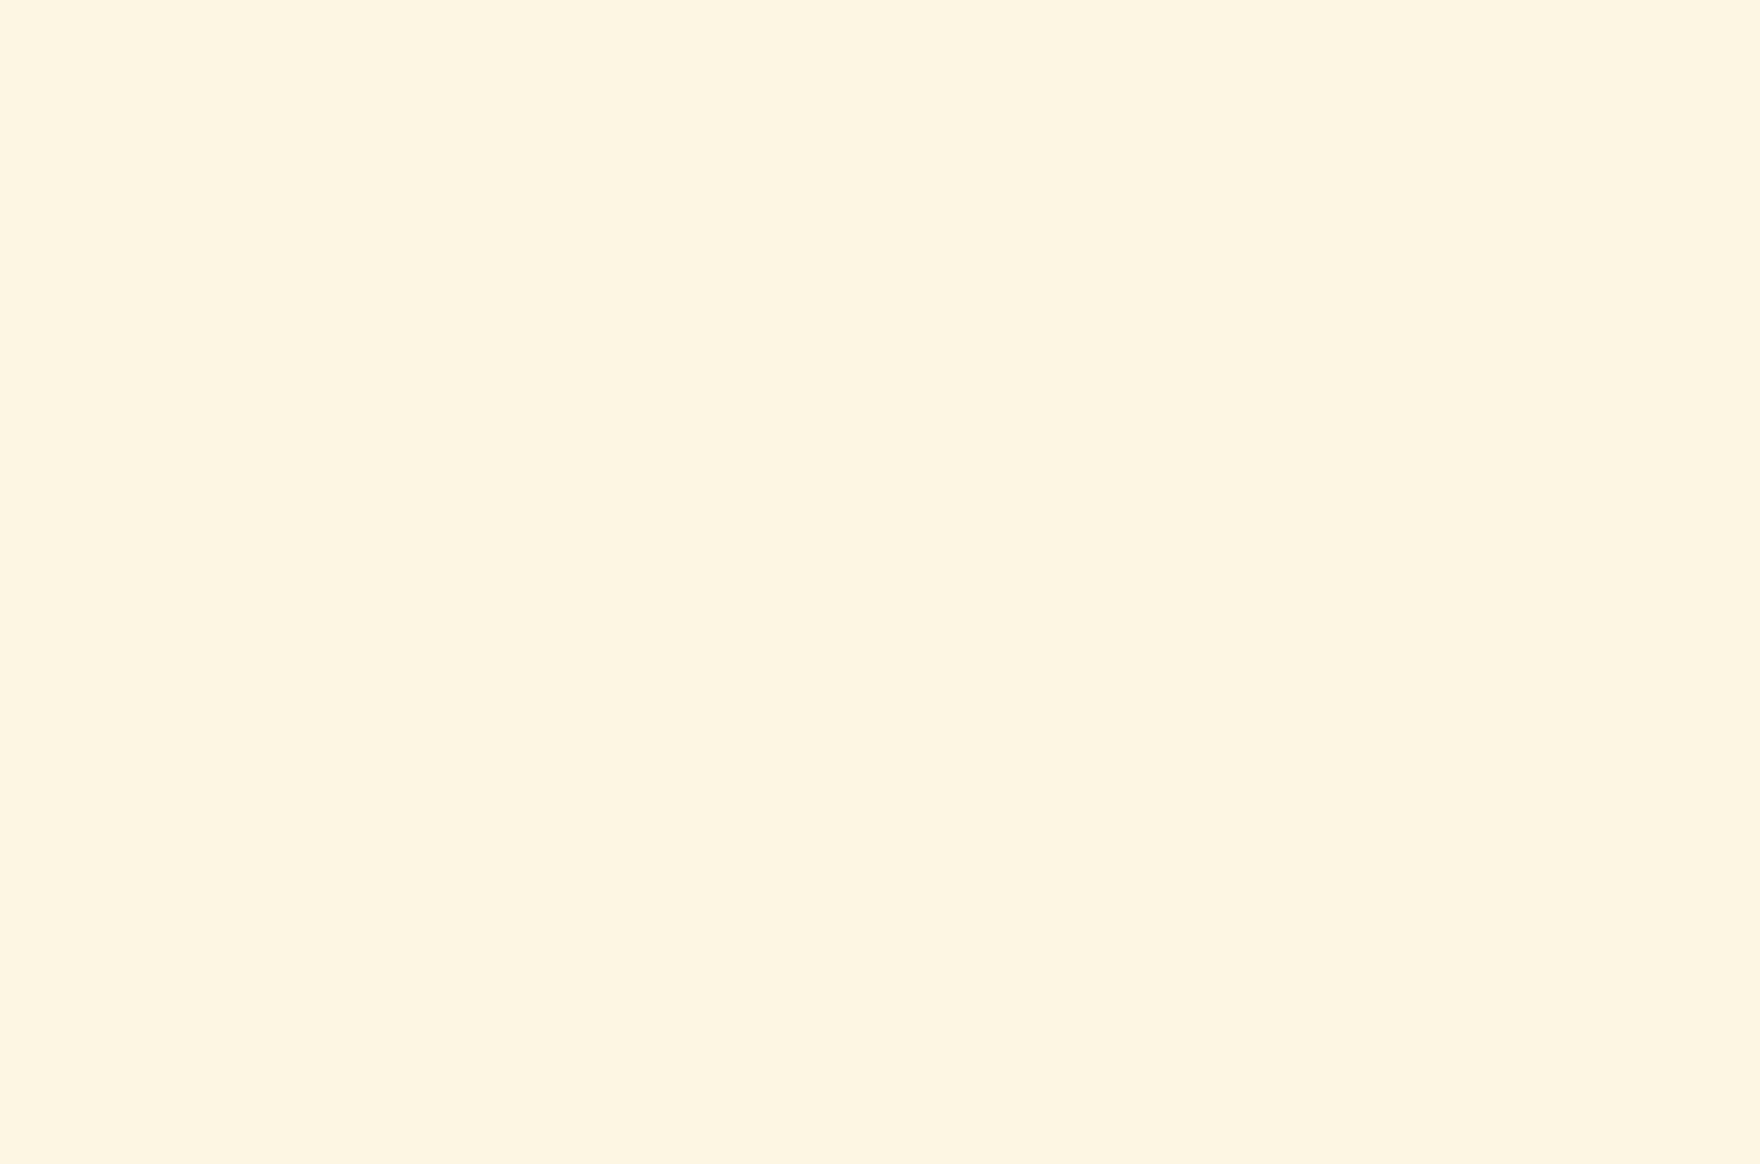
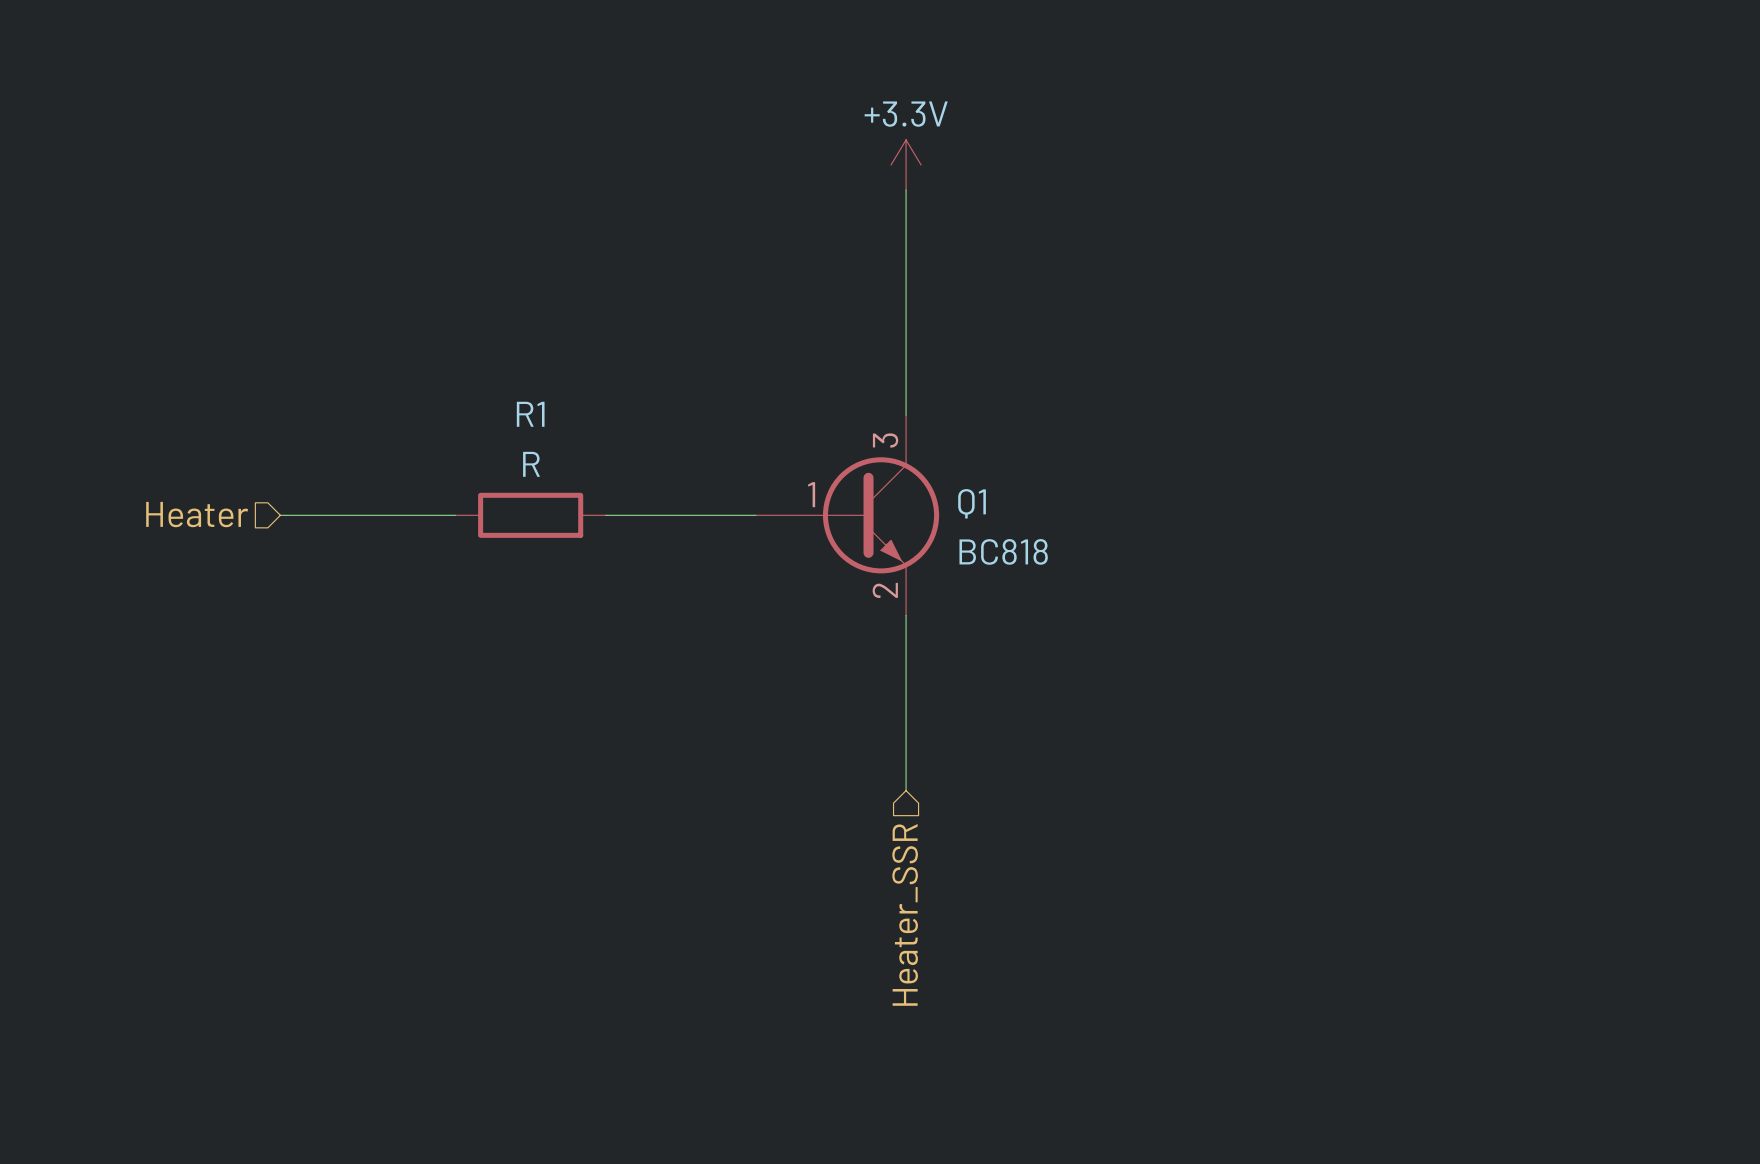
power symbol: none -> +3.3V (906, 164)
wire: none -> (906, 189) (906, 415)
hierarchical label: none -> Heater (197, 514)
wire: none -> (280, 515) (455, 515)
R1: none -> R (530, 515)
wire: none -> (605, 515) (755, 515)
Q1: none -> BC818 (847, 515)
wire: none -> (906, 615) (906, 790)
hierarchical label: none -> Heater_SSR (905, 914)

